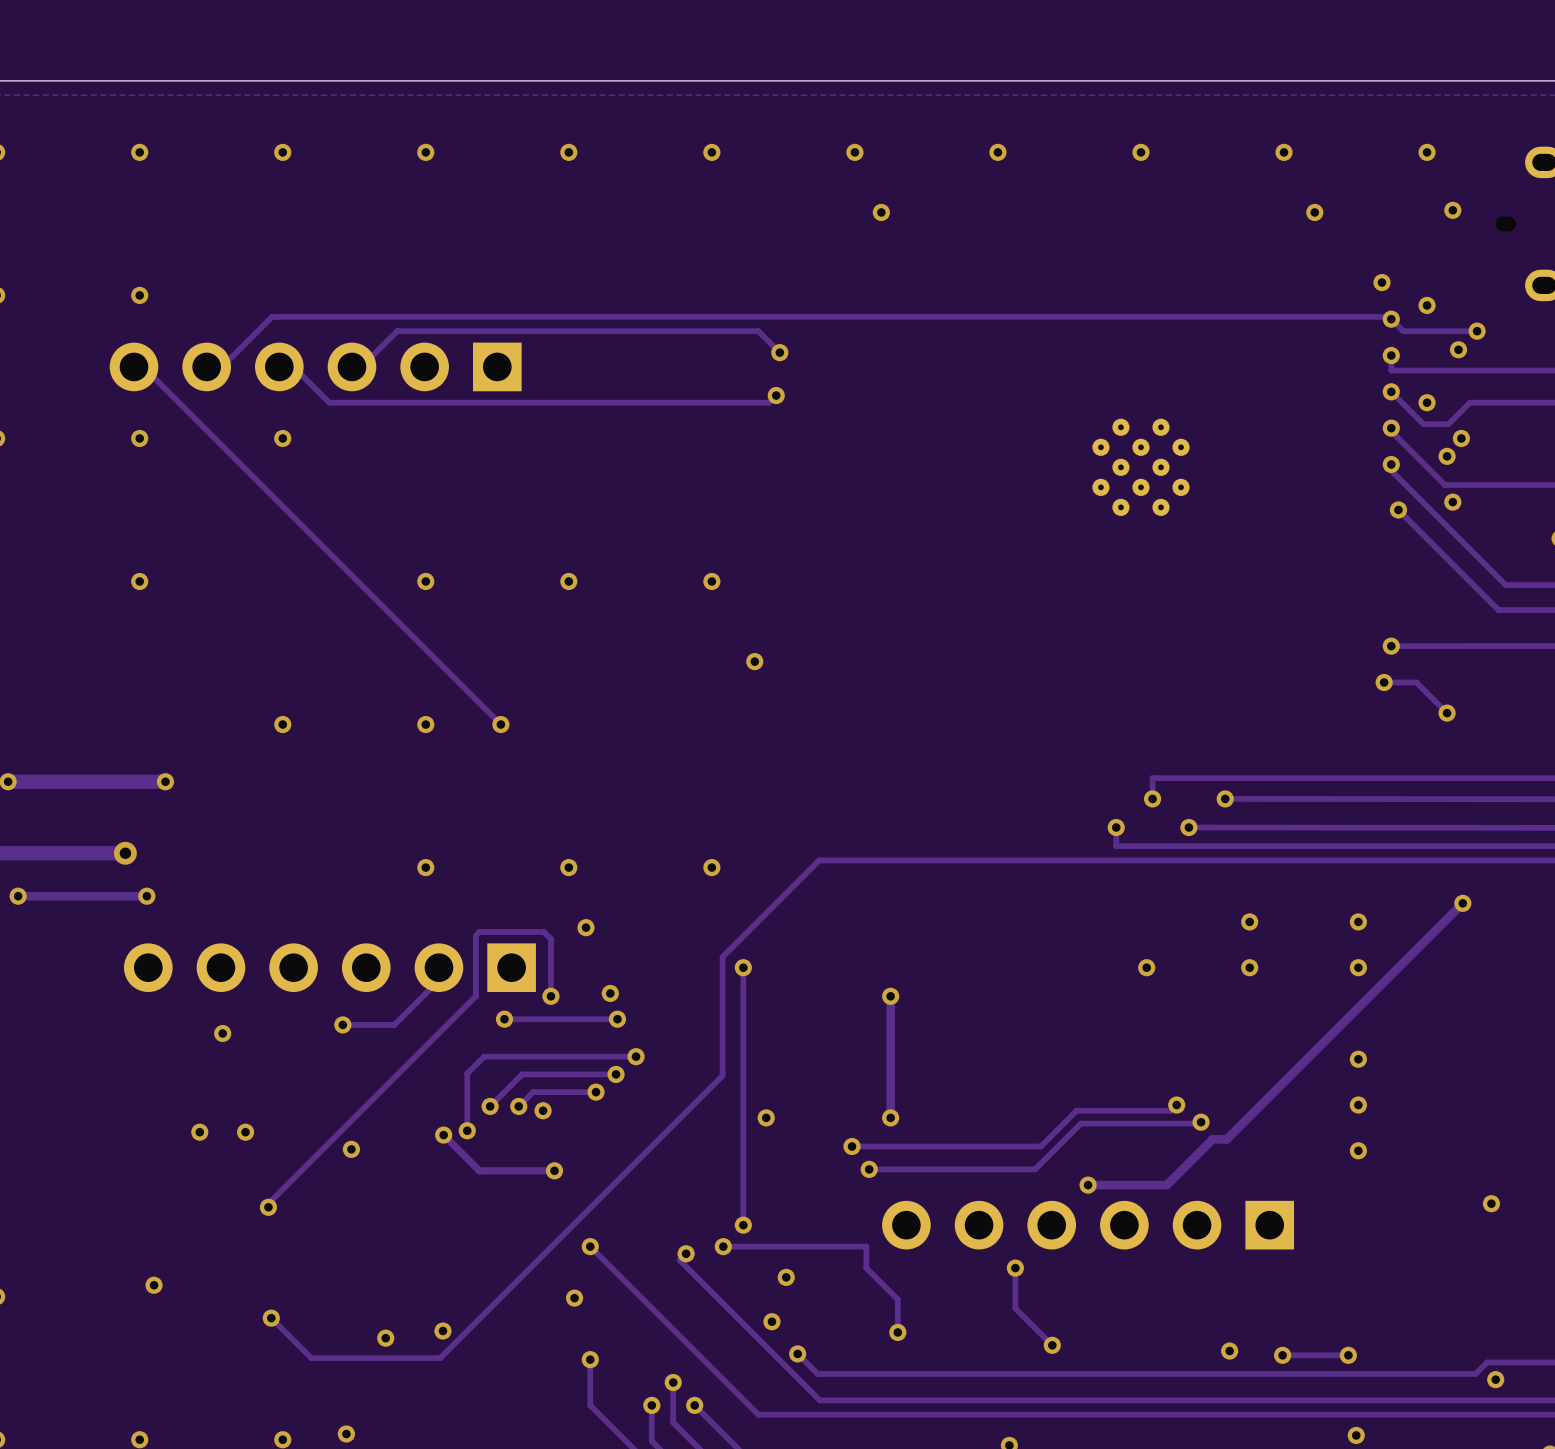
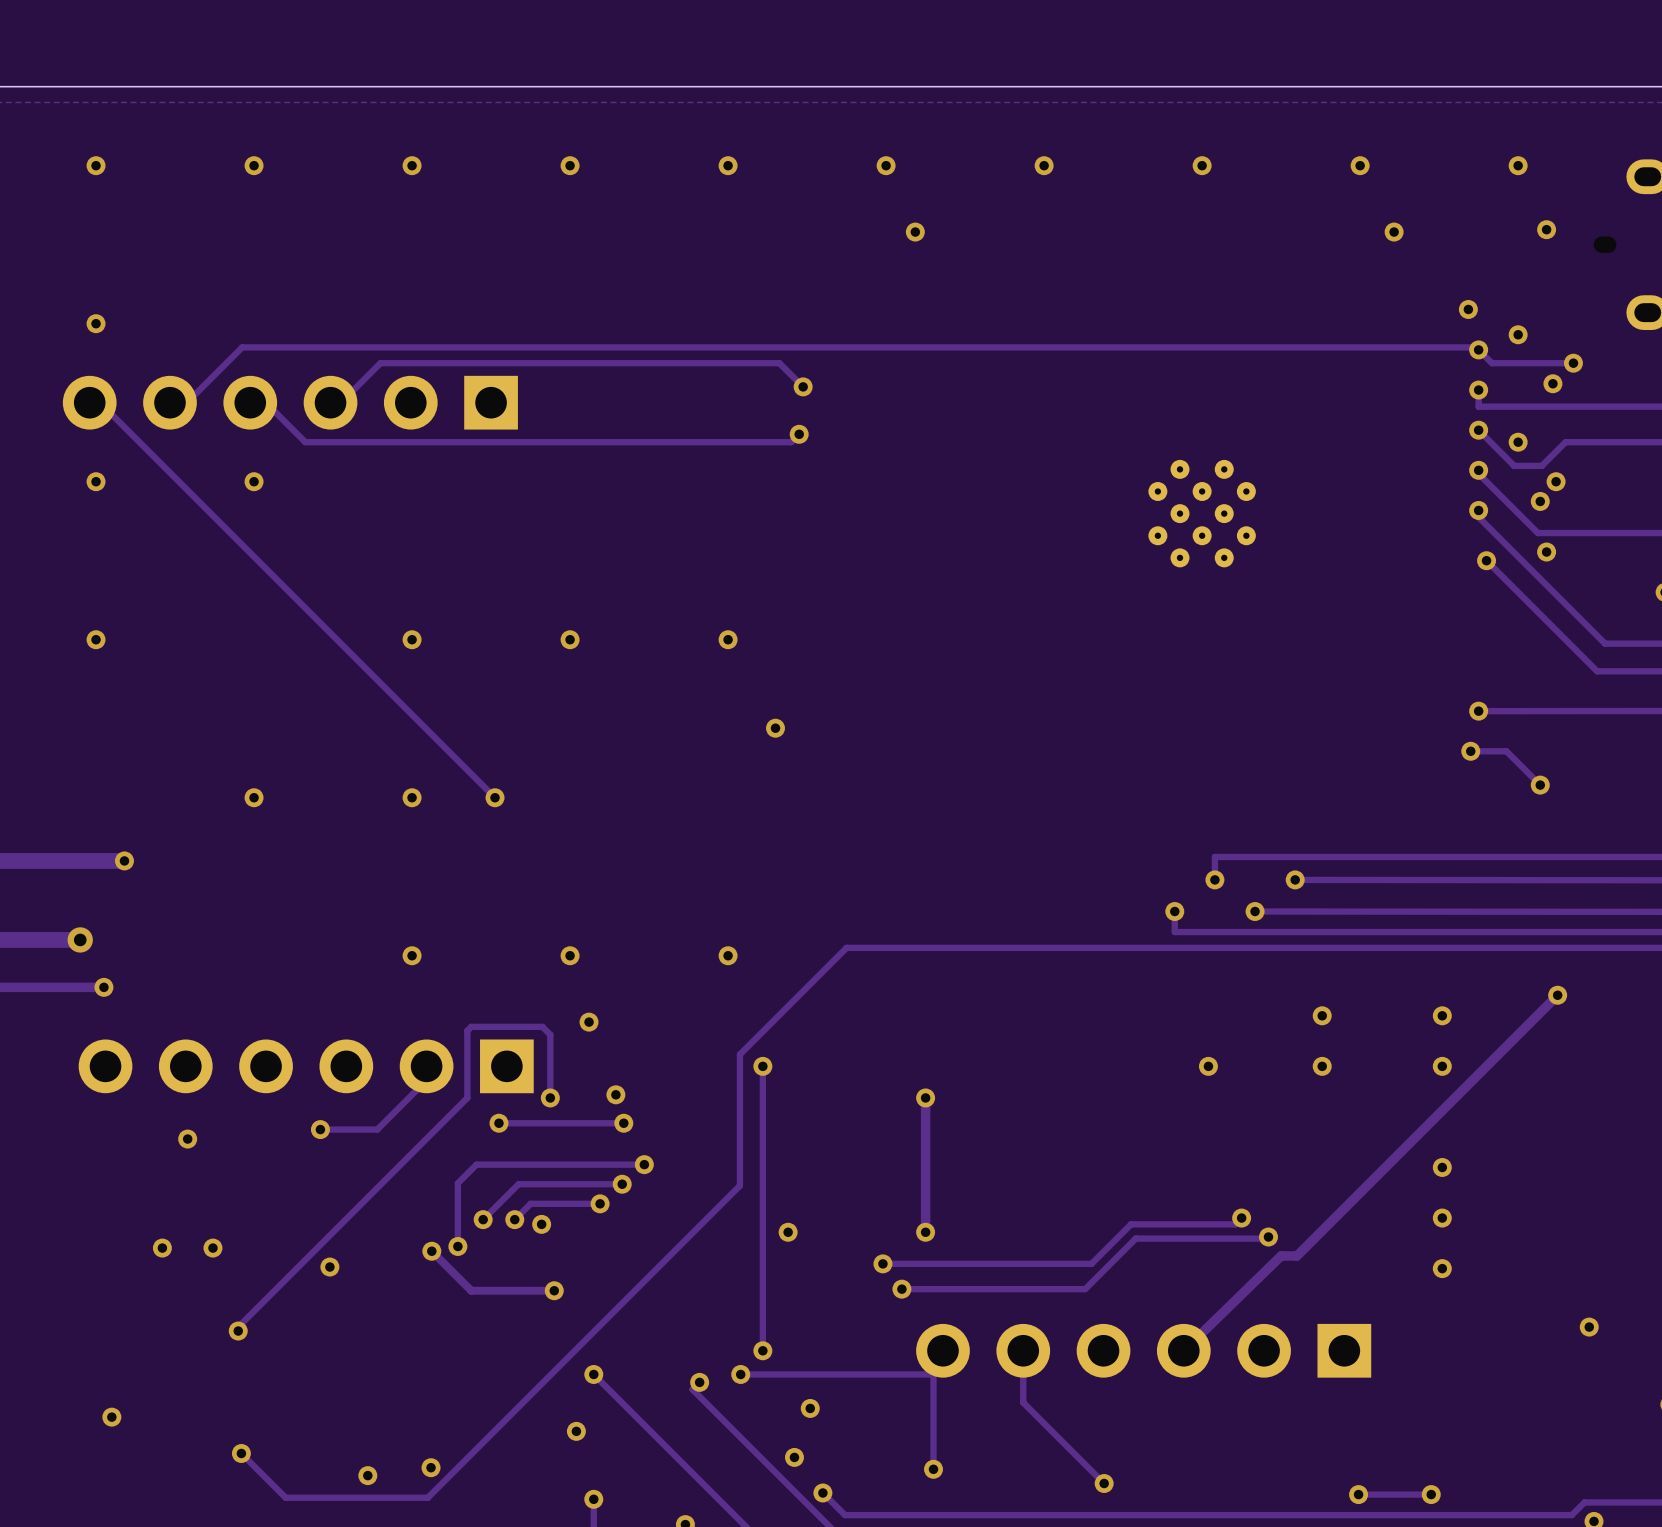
track: (1212, 1139) (1166, 1185) (1088, 1185) -> (1281, 1255) (1183, 1350)
via: (1088, 1185) -> none
track: (866, 1246) (866, 1268) (897, 1299) -> (942, 1350) (933, 1360) (933, 1432)
track: none -> (933, 1374) (898, 1374)
track: (1015, 1268) (1015, 1308) -> (1023, 1350) (1023, 1402) (1063, 1442)
via: (1015, 1268) -> none
via: (1229, 1351) -> none

